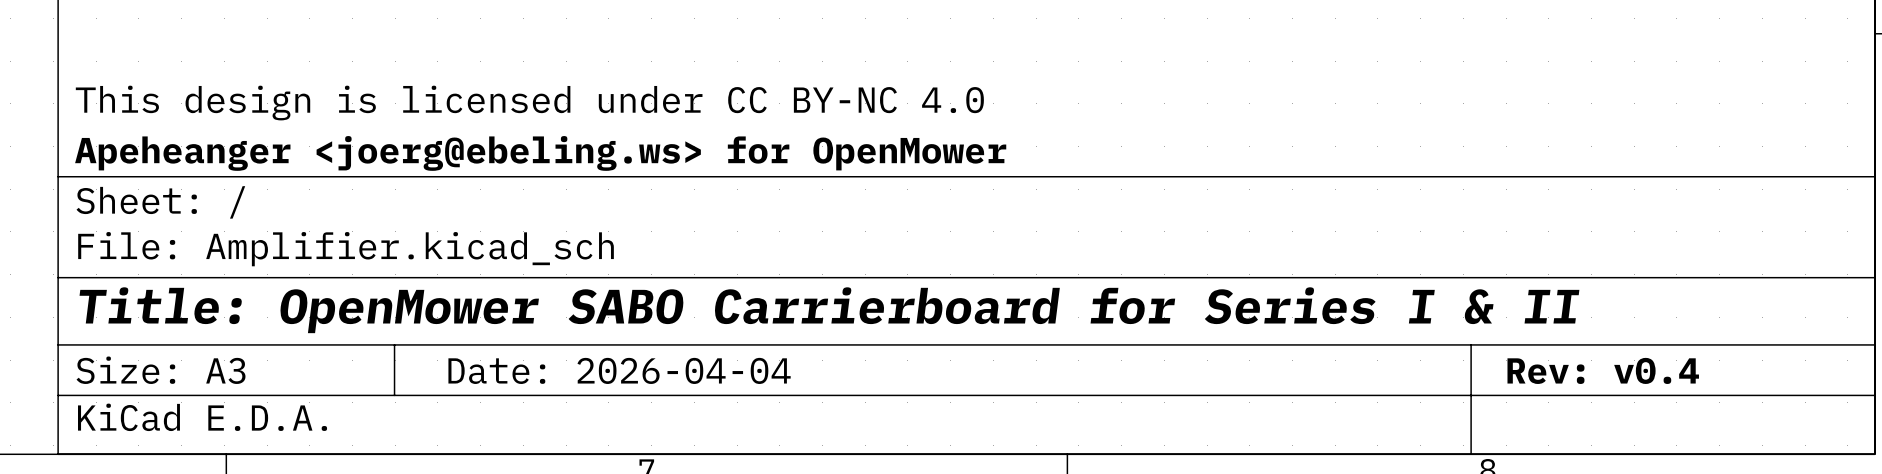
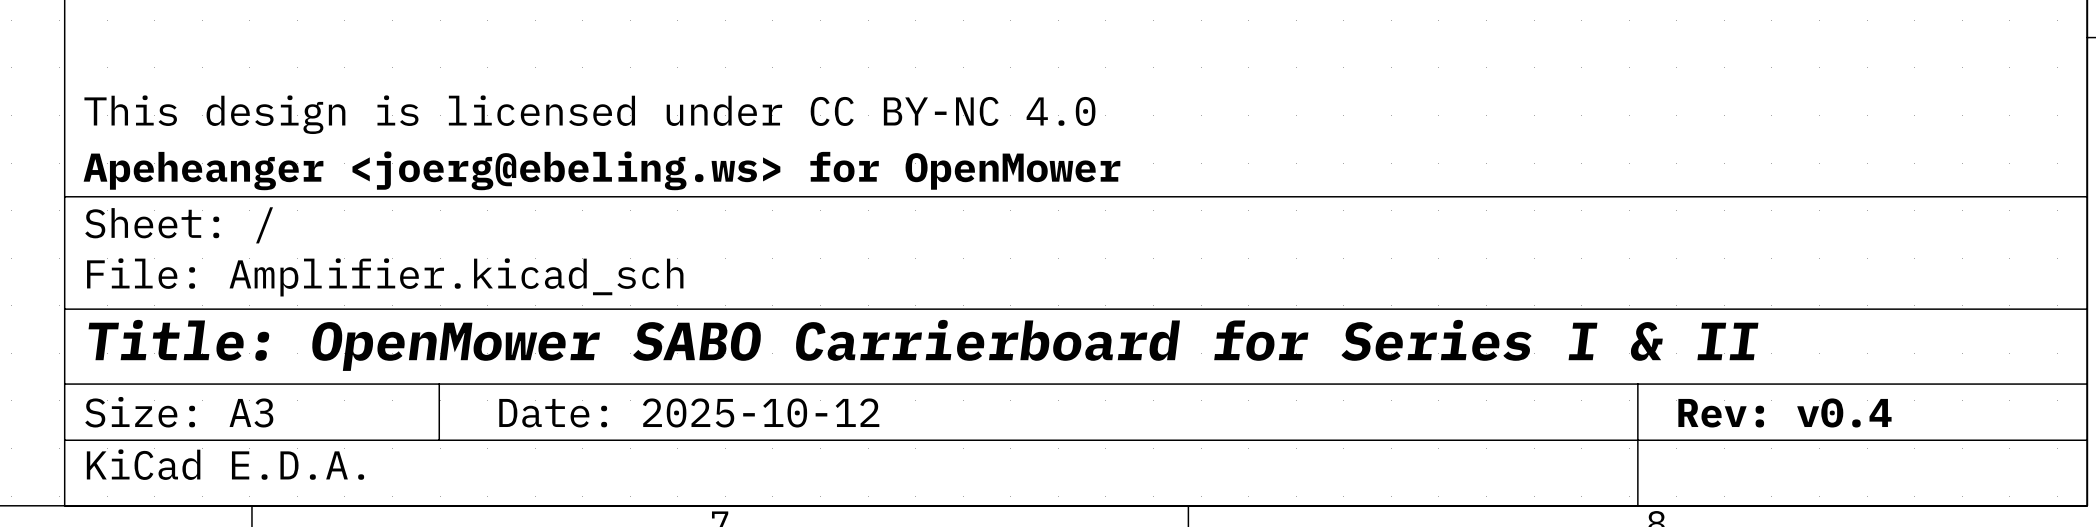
title block: Date: 2026-04-04 (619, 370) -> Date: 2025-10-12 (689, 412)

